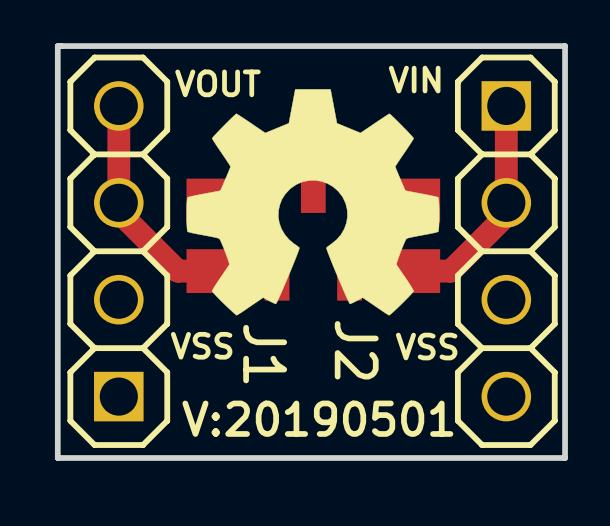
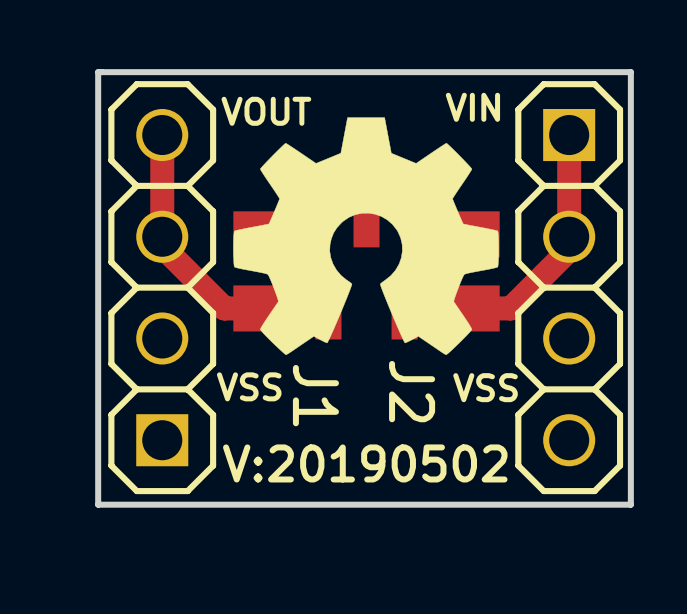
drawing shape: [182, 400, 454, 437] -> [223, 444, 508, 483]

